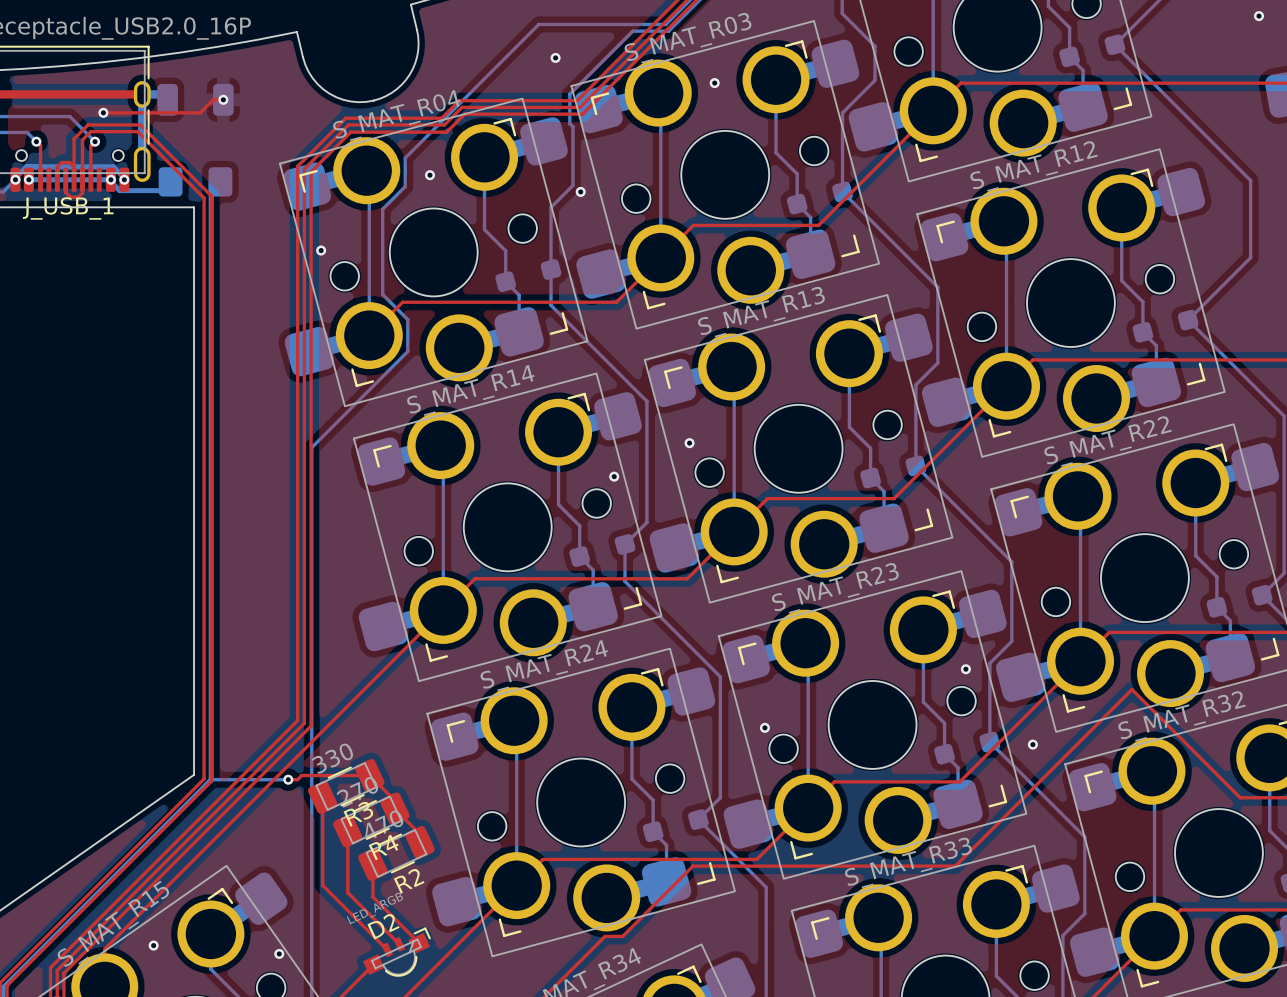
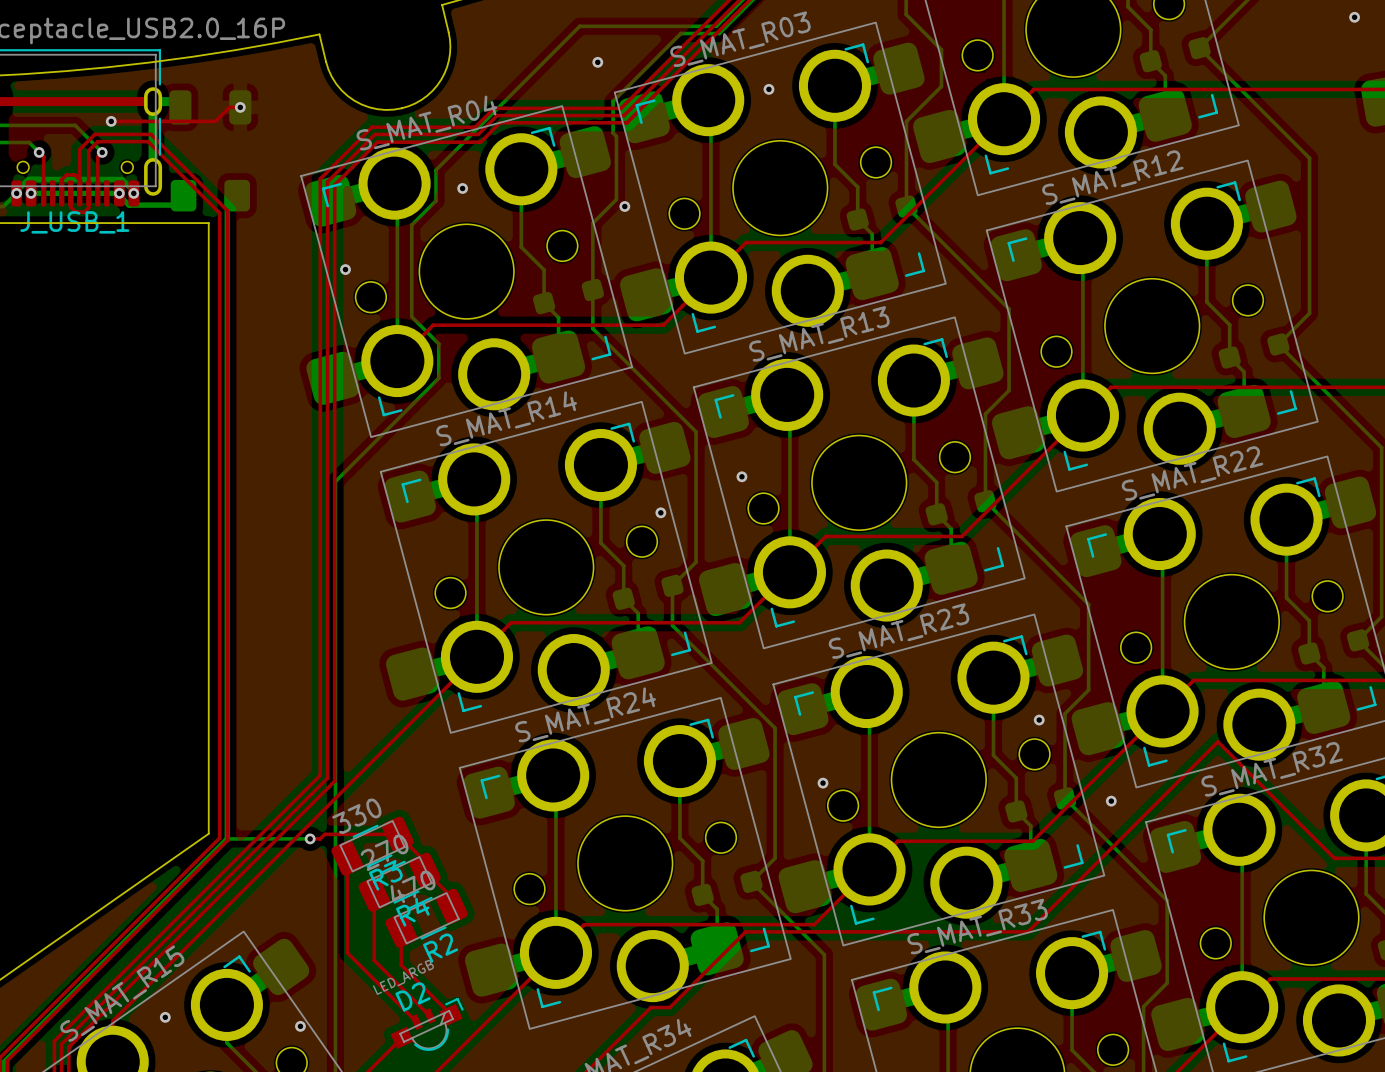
bottom track: (1217, 147) (1250, 180) (1250, 257) (1217, 291) -> (1309, 158) (1309, 313)

